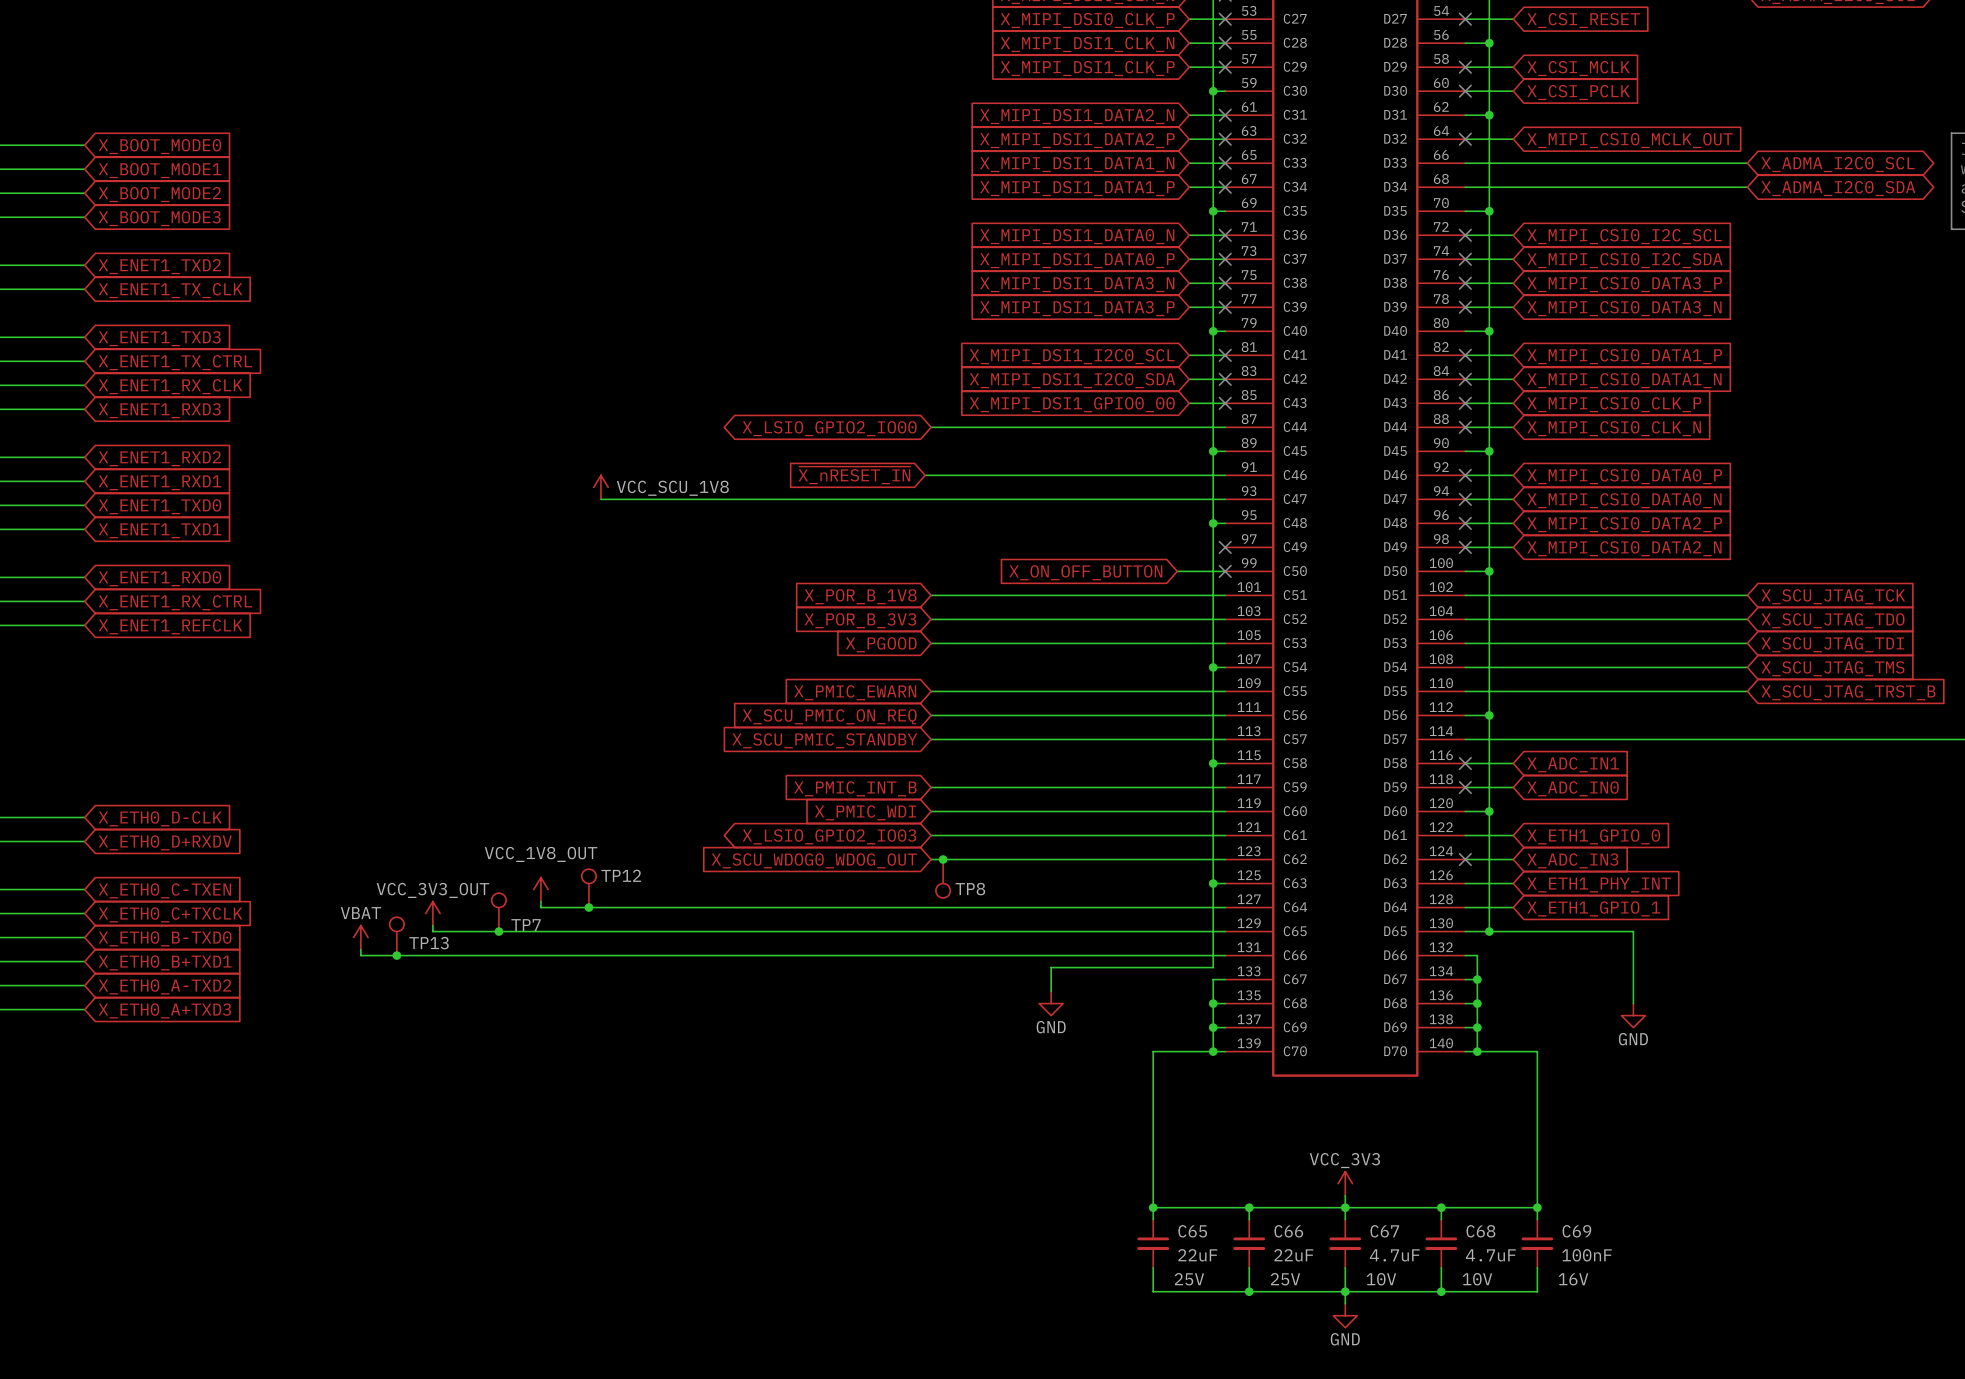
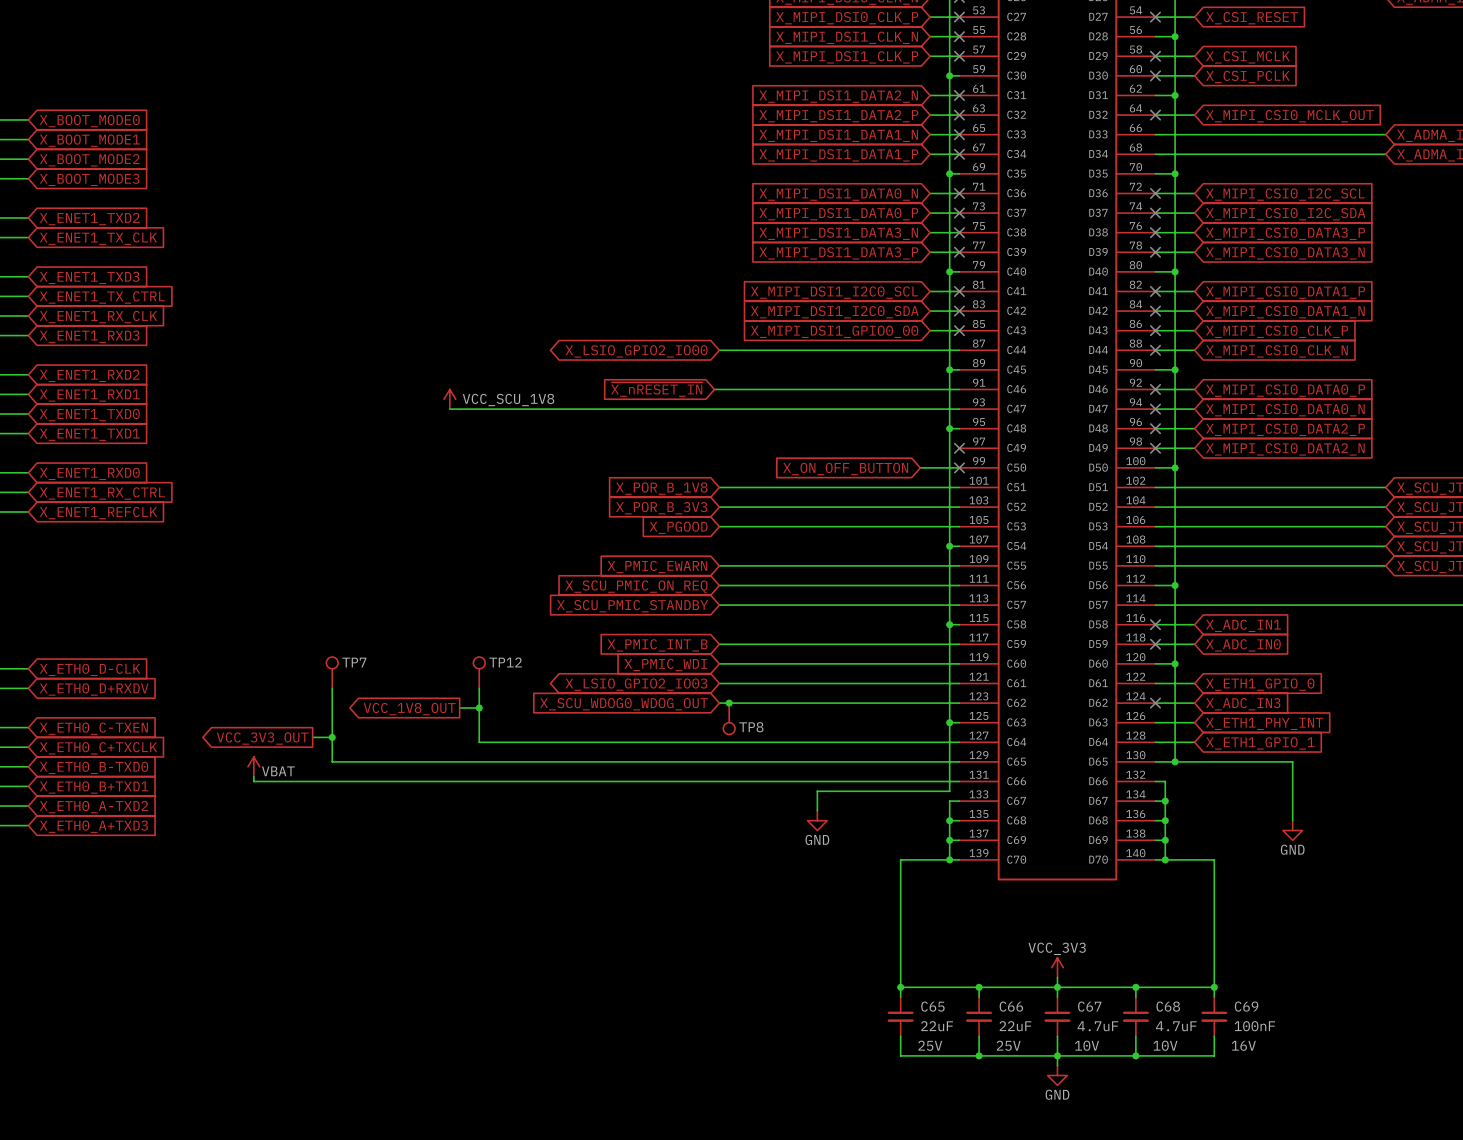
wire: none -> (459, 708) (479, 708)
junction: none -> (479, 708)
global label: none -> VCC_1V8_OUT (409, 709)
TP12 position: (588, 888) -> (479, 672)
power symbol: VCC_1V8_OUT (540, 889) -> none
wire: none -> (312, 737) (332, 737)
junction: none -> (332, 737)
wire: (540, 901) (540, 907) (636, 907) -> (479, 688) (479, 742)
global label: none -> VCC_3V3_OUT (262, 738)
junction: (588, 907) -> none
TP7 position: (498, 912) -> (332, 672)
power symbol text position: VBAT (360, 913) -> VBAT (278, 771)
power symbol: VCC_3V3_OUT (432, 913) -> none
wire: (432, 925) (432, 931) (456, 931) -> (332, 688) (332, 761)
TP7 name position: TP7 (526, 925) -> TP7 (354, 662)
junction: (498, 931) -> none
TP13: (396, 936) -> none
junction: (396, 955) -> none

